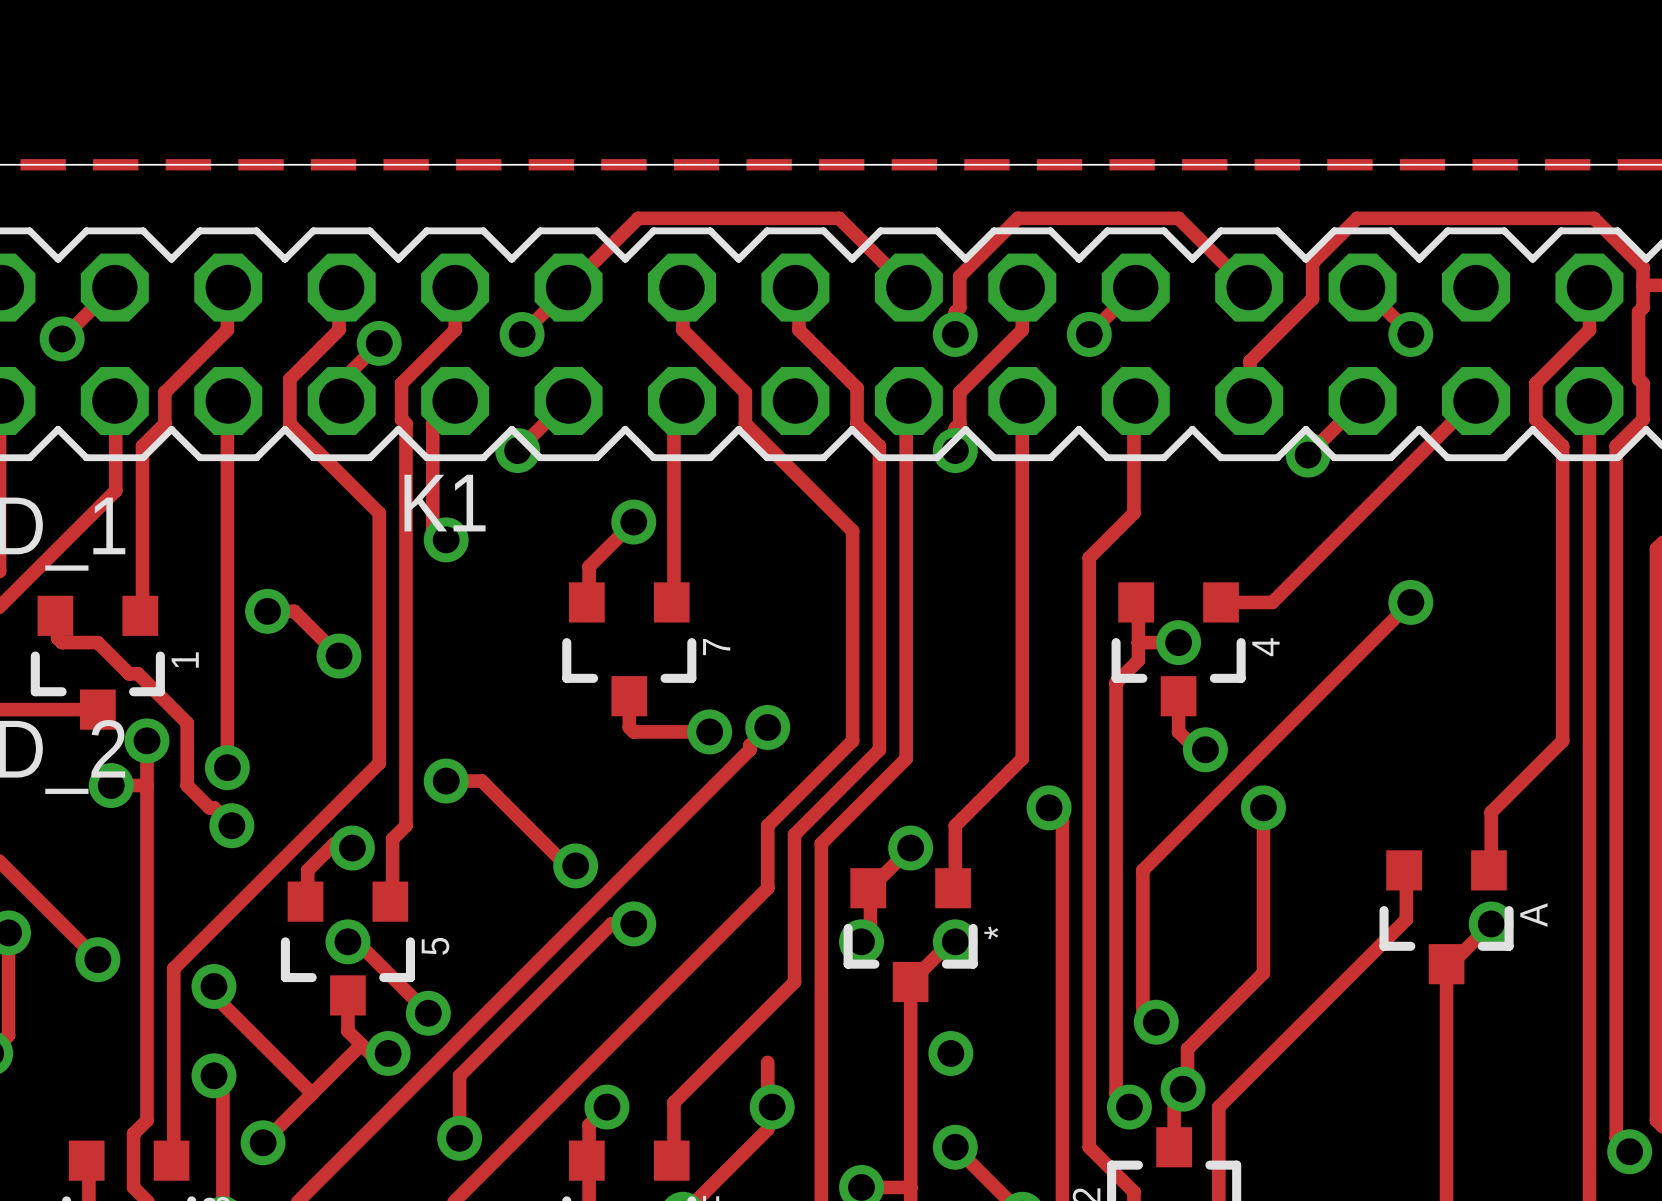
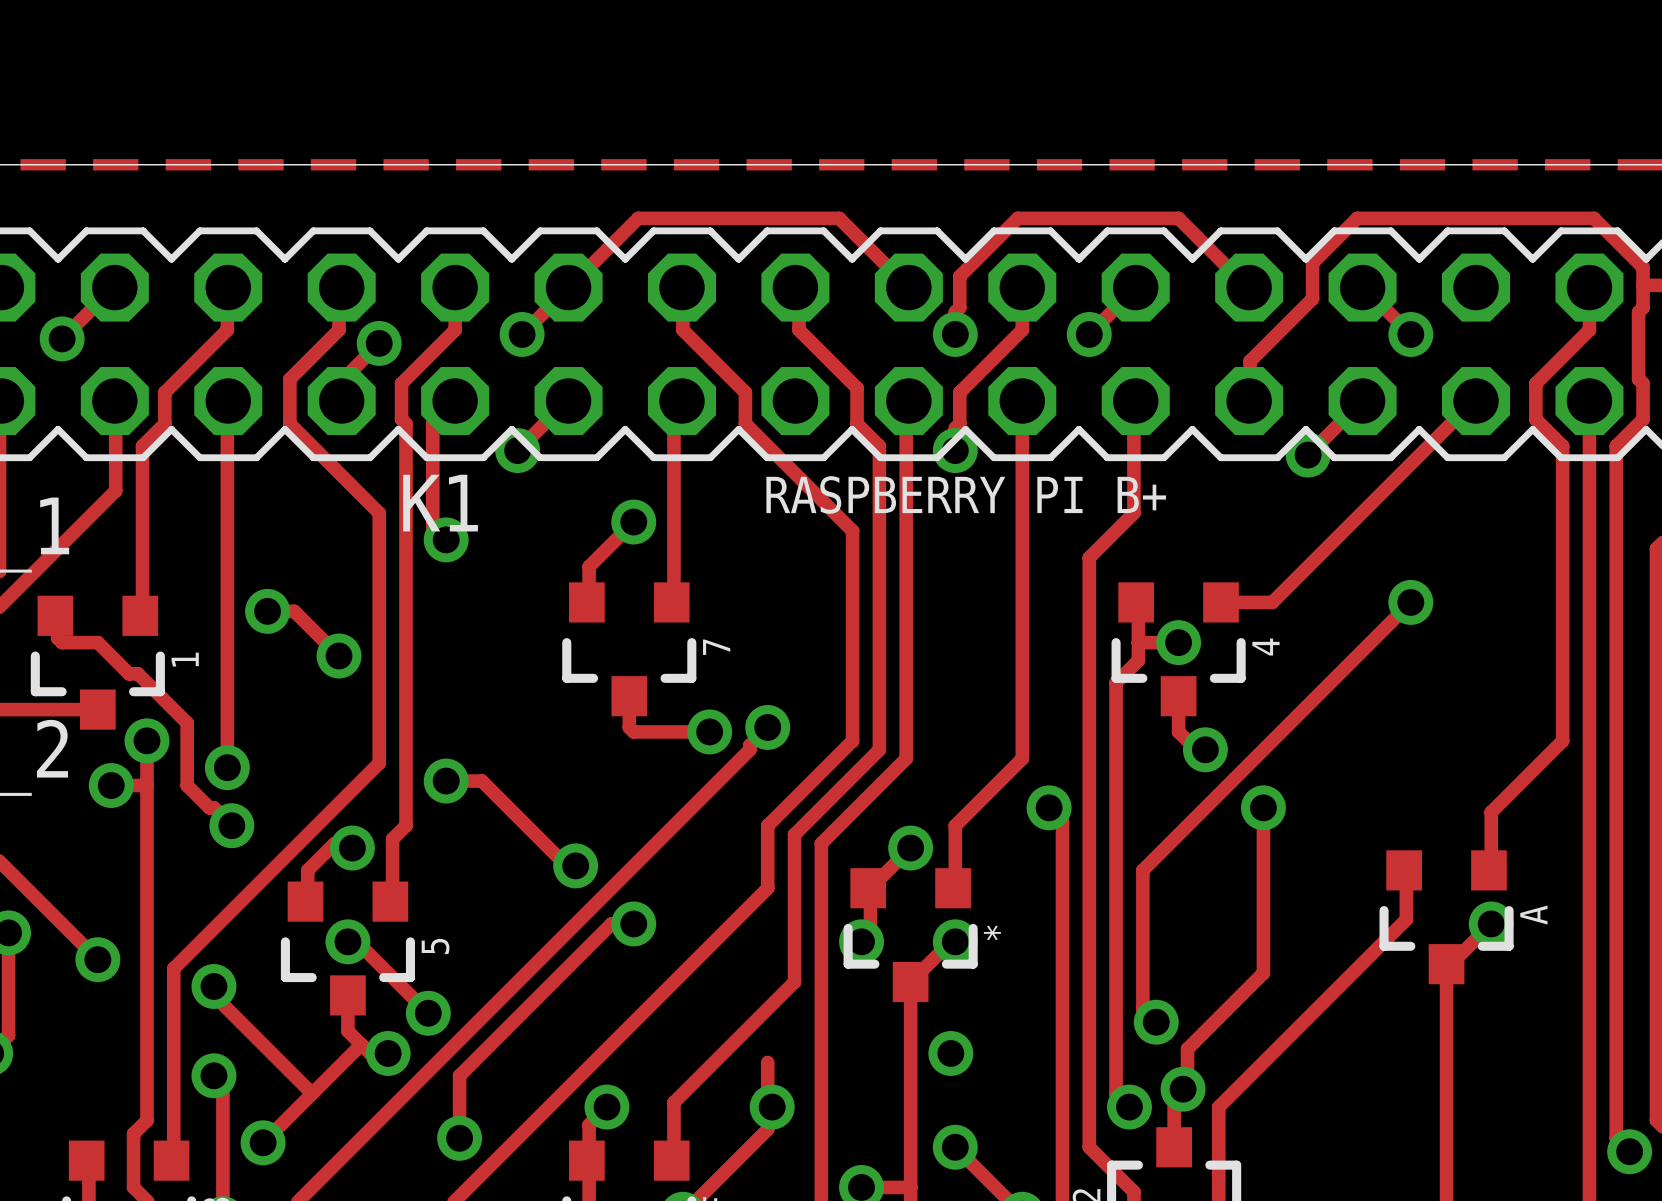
text: none -> RASPBERRY PI B+ (966, 494)

